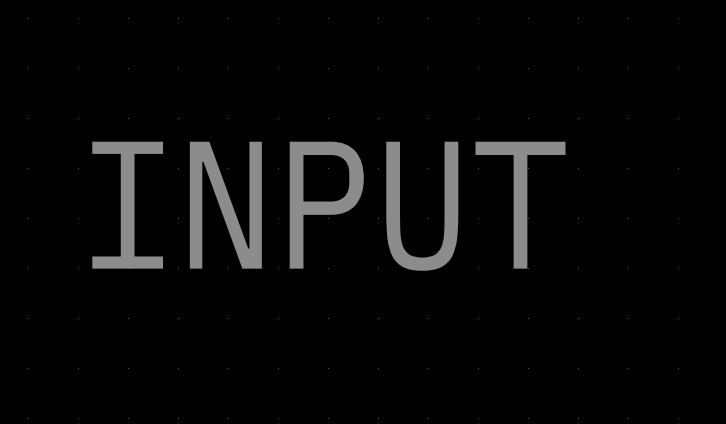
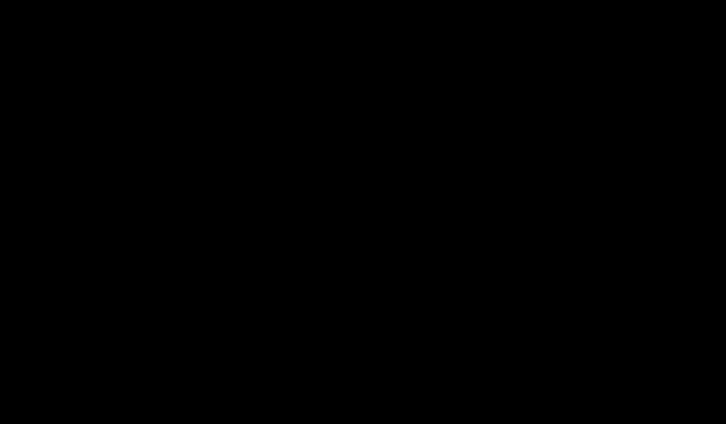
text: INPUT (328, 206) -> none

